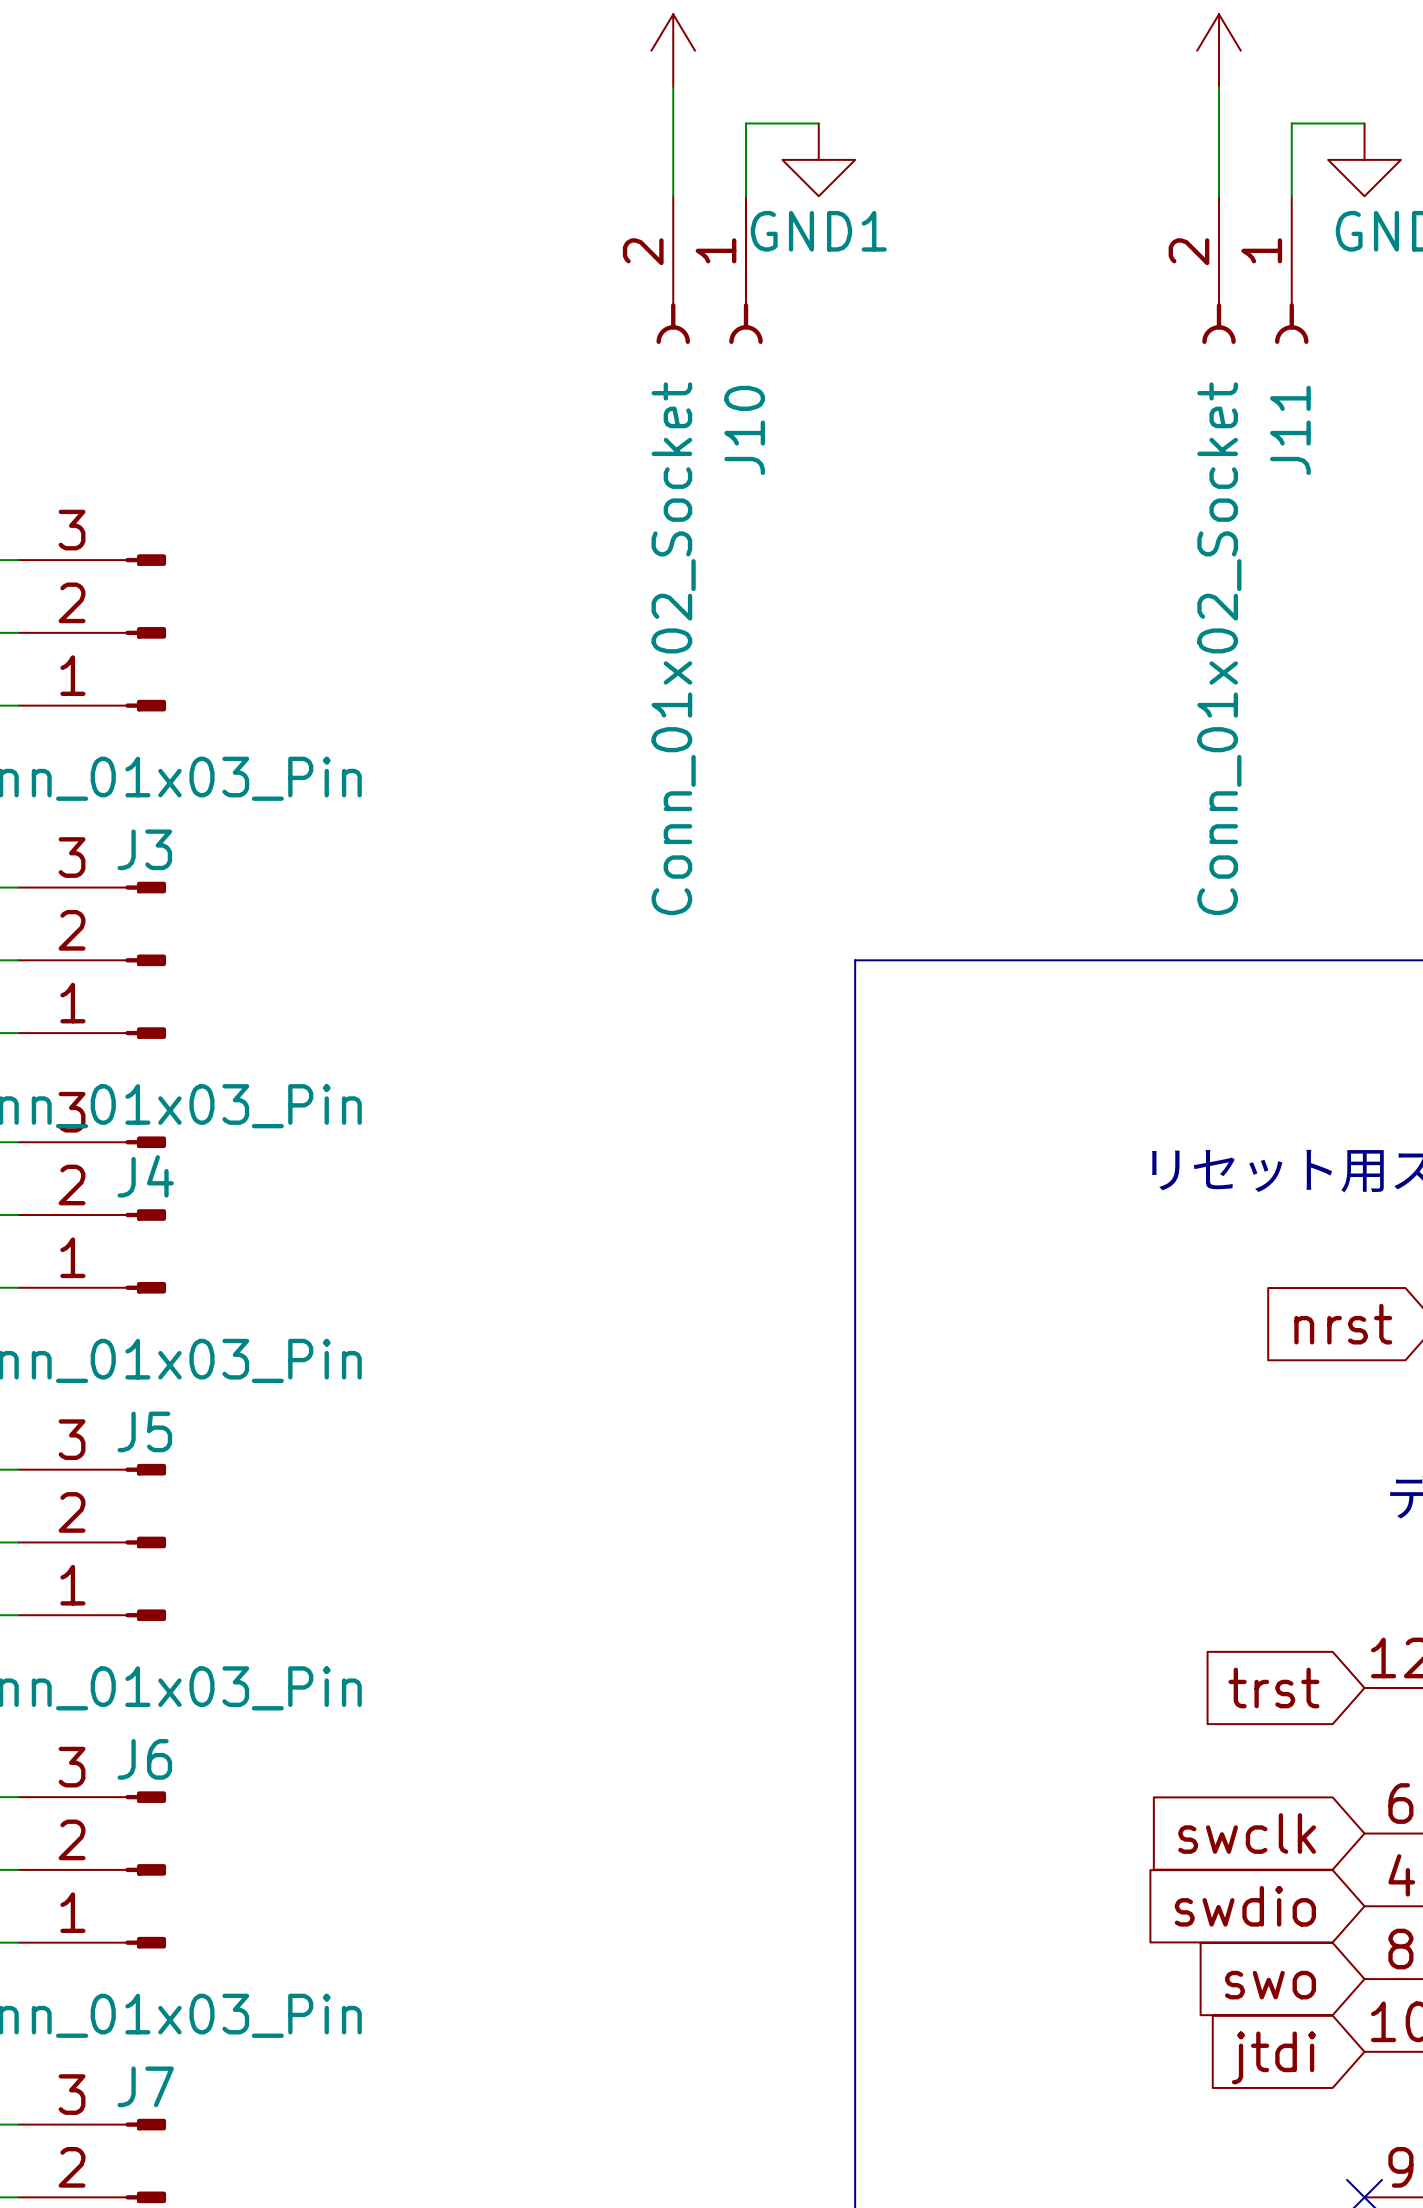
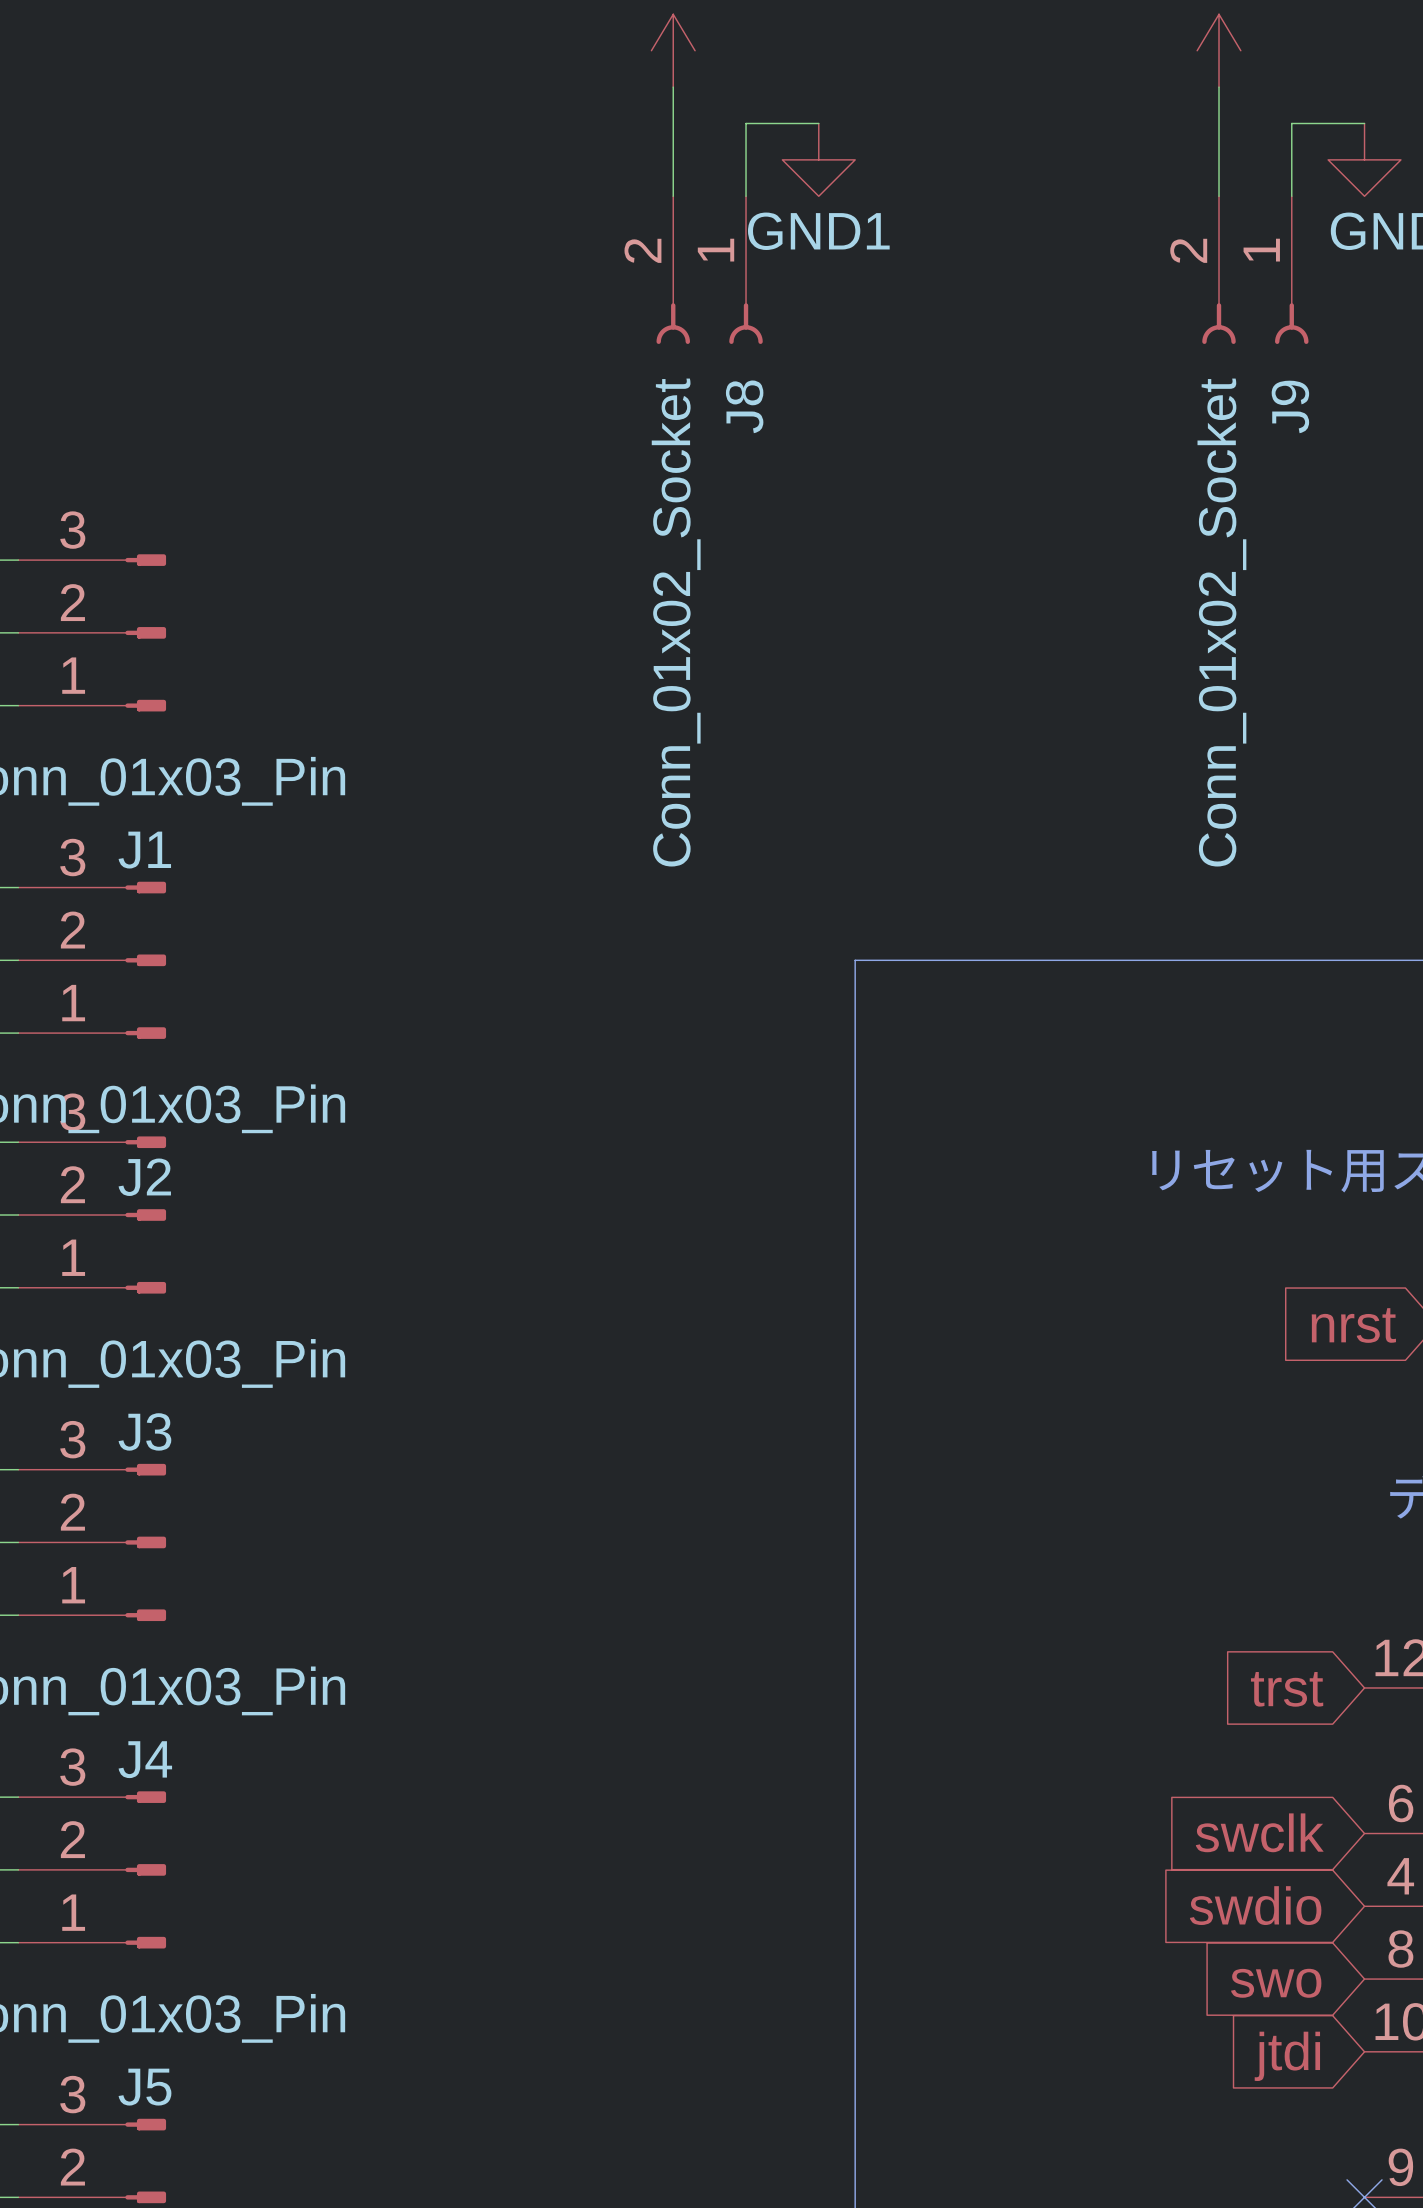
J10 name: J10 (744, 430) -> J8 (744, 406)
J11 name: J11 (1290, 430) -> J9 (1290, 406)
J3 name: J3 (144, 849) -> J1 (144, 850)
J4 name: J4 (145, 1176) -> J2 (144, 1177)
J5 name: J5 (144, 1431) -> J3 (144, 1431)
J6 name: J6 (144, 1759) -> J4 (145, 1759)
J7 name: J7 (145, 2086) -> J5 (144, 2087)

